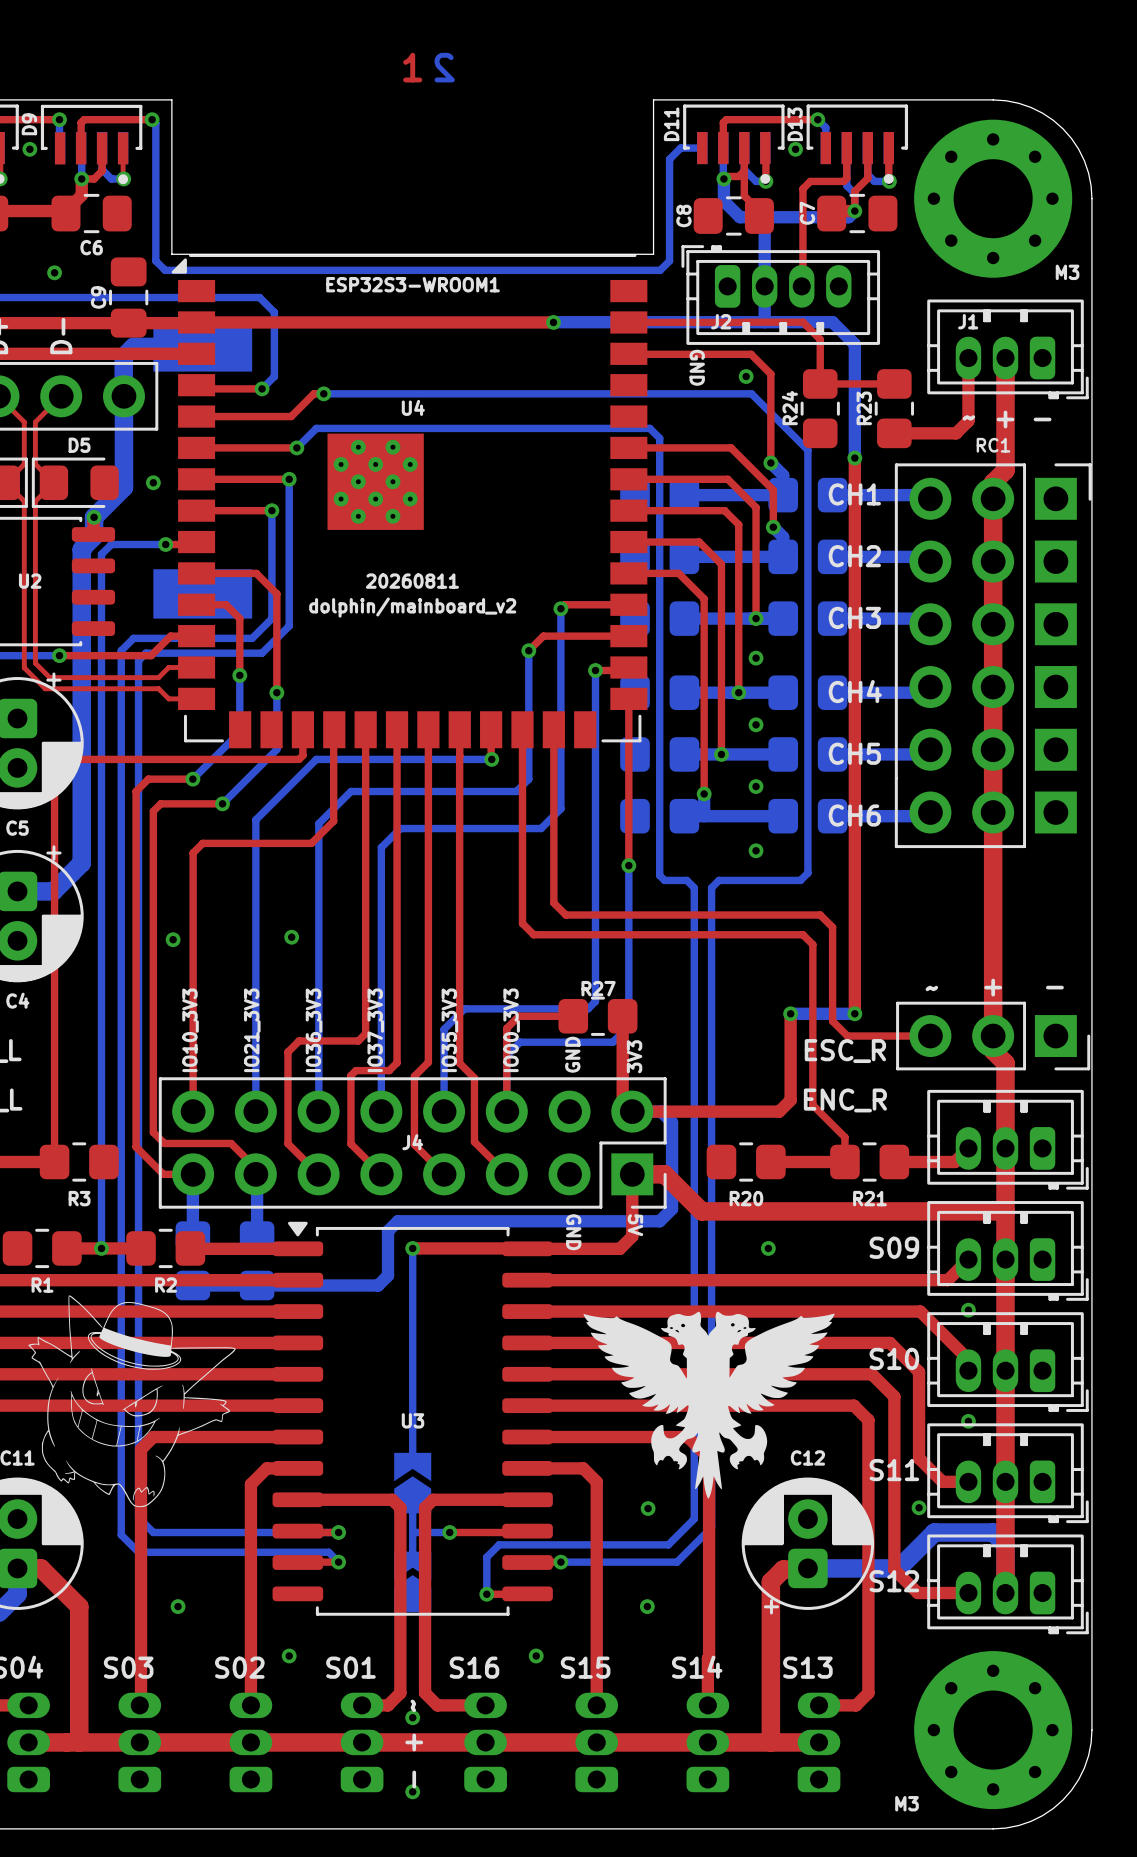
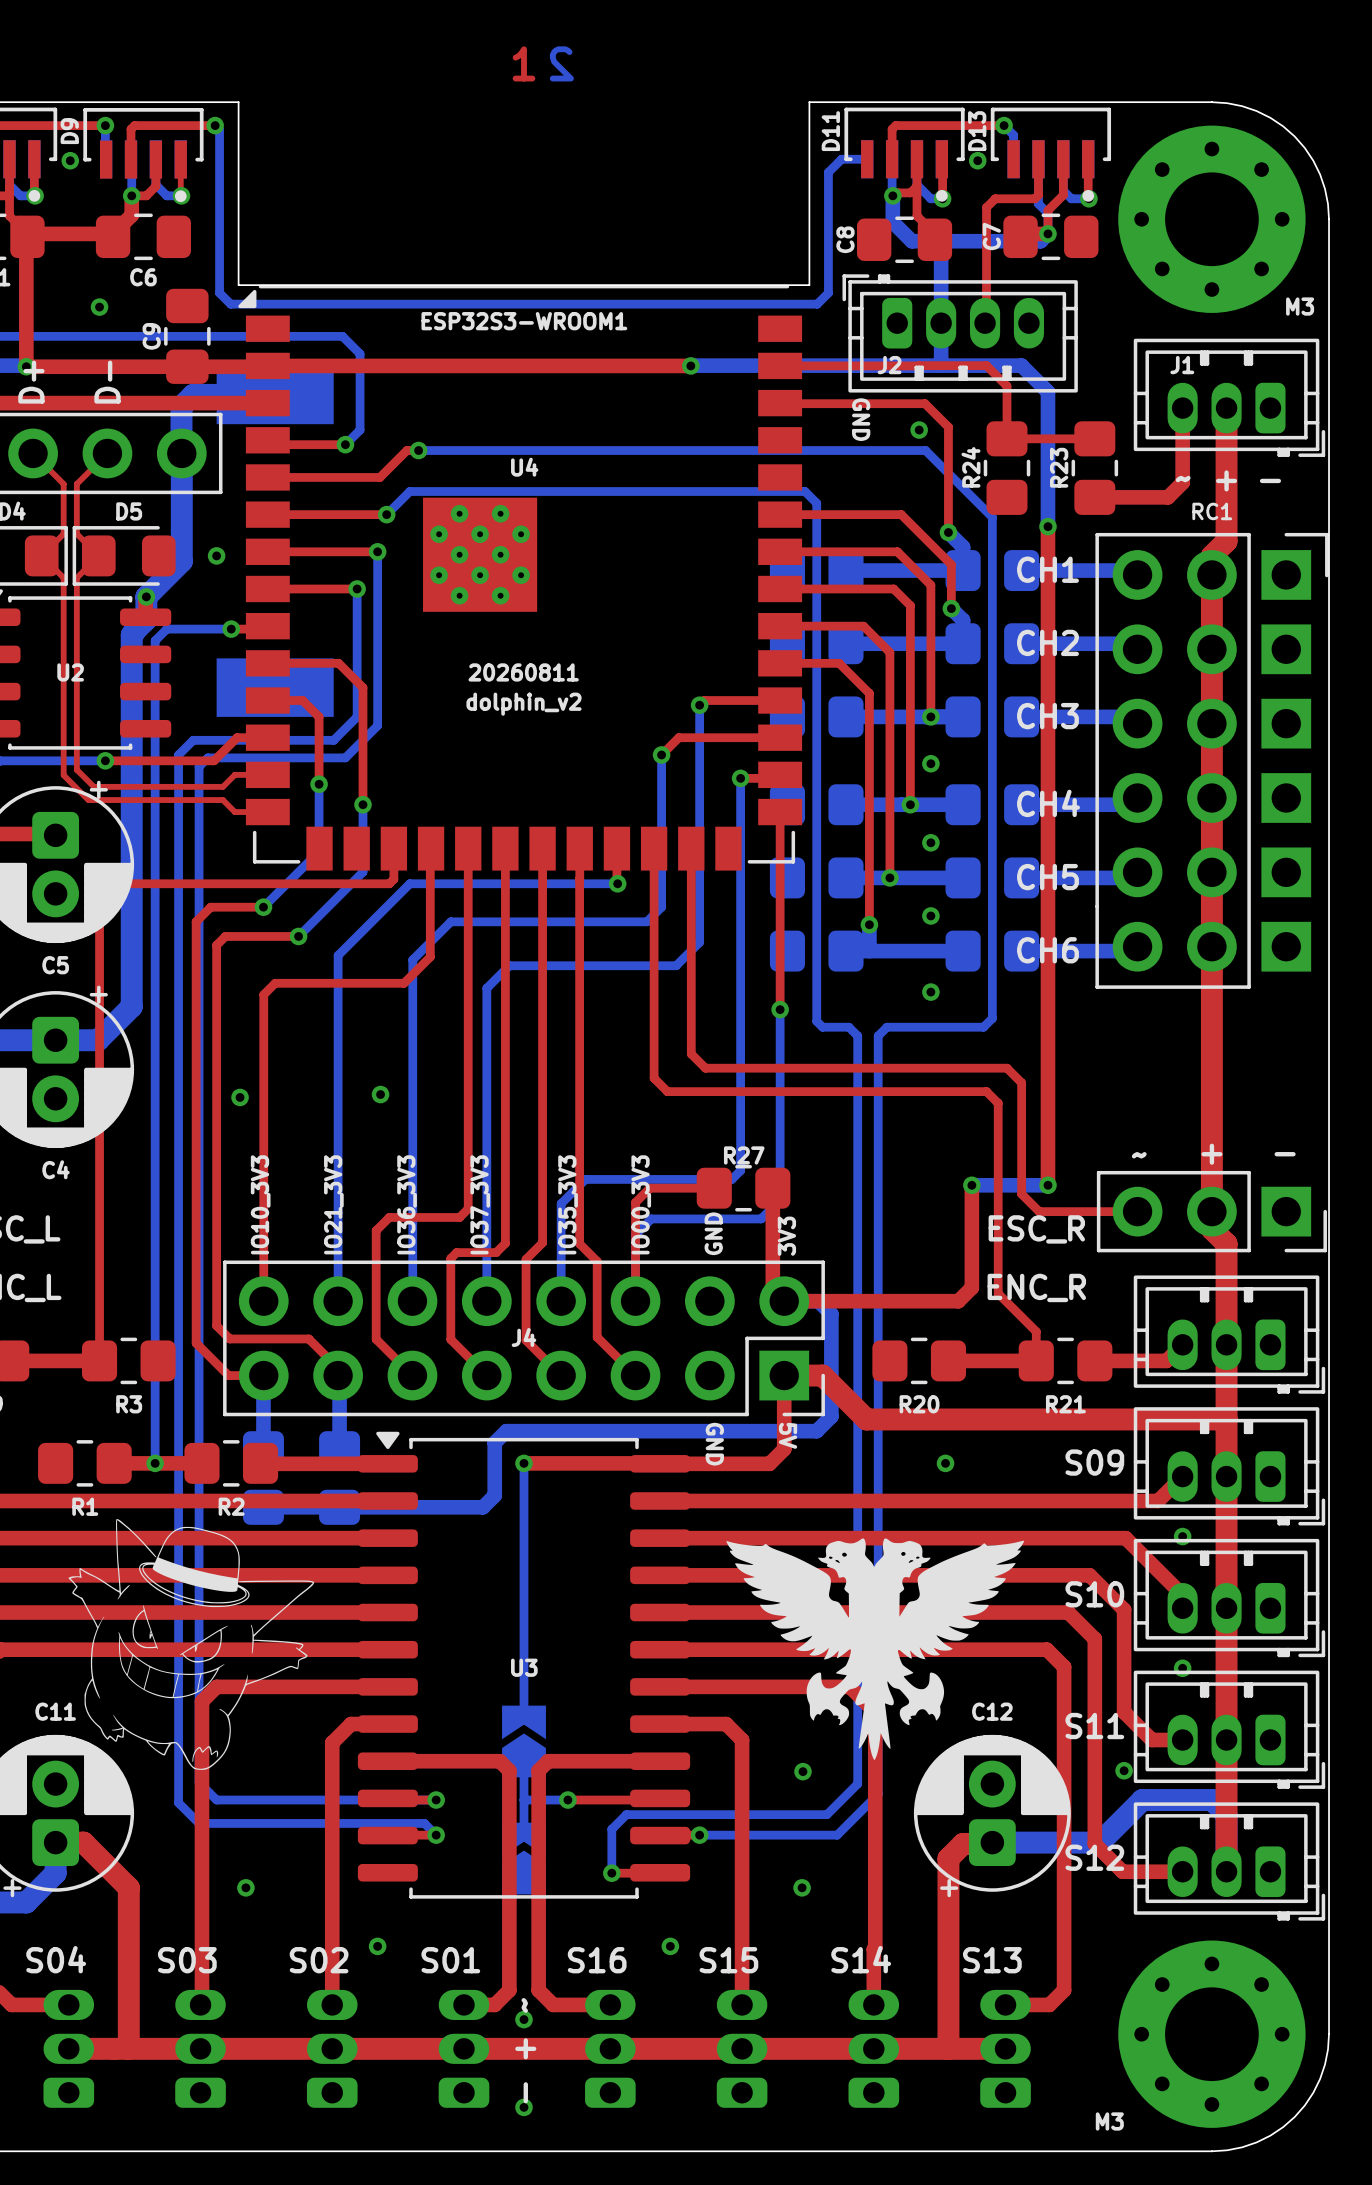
text: dolphin/mainboard_v2 (412, 607) -> dolphin_v2 (524, 704)

